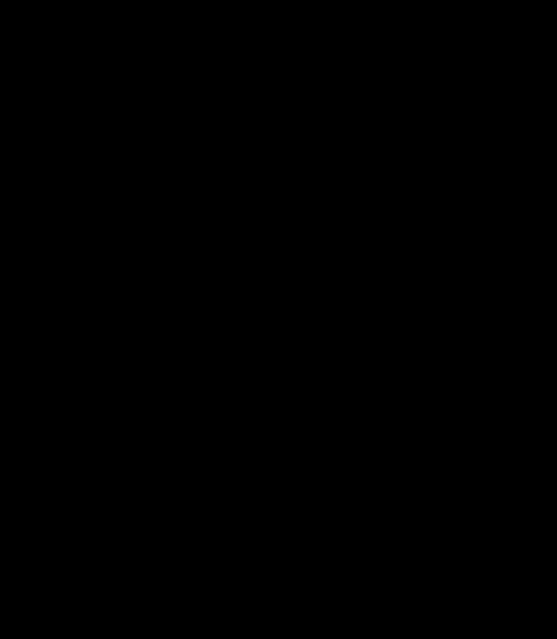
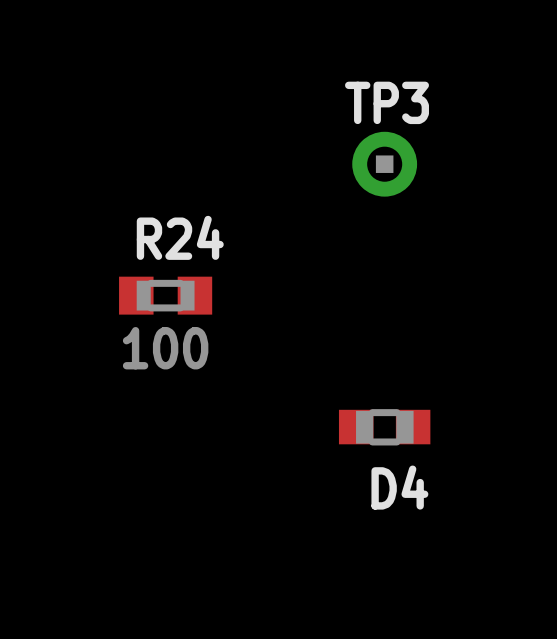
TP3: none -> (384, 164)
R24: none -> 100 (165, 295)
D4: none -> (384, 427)

